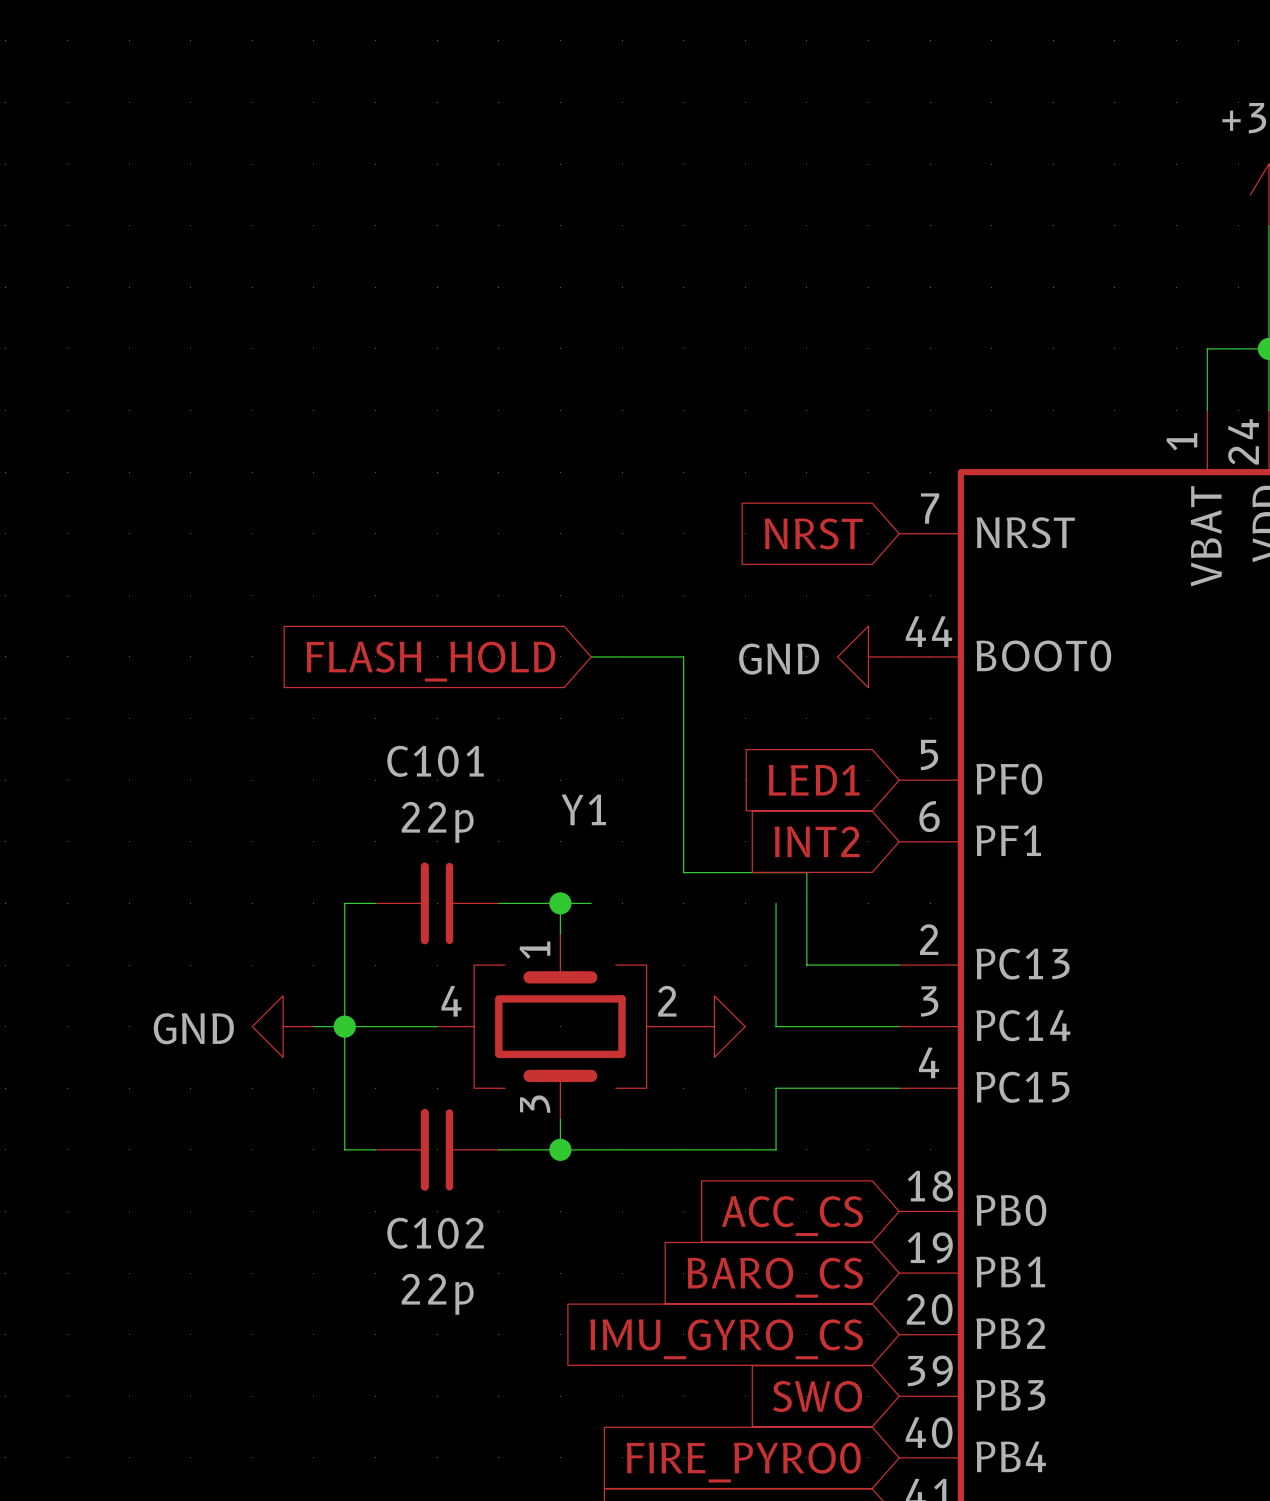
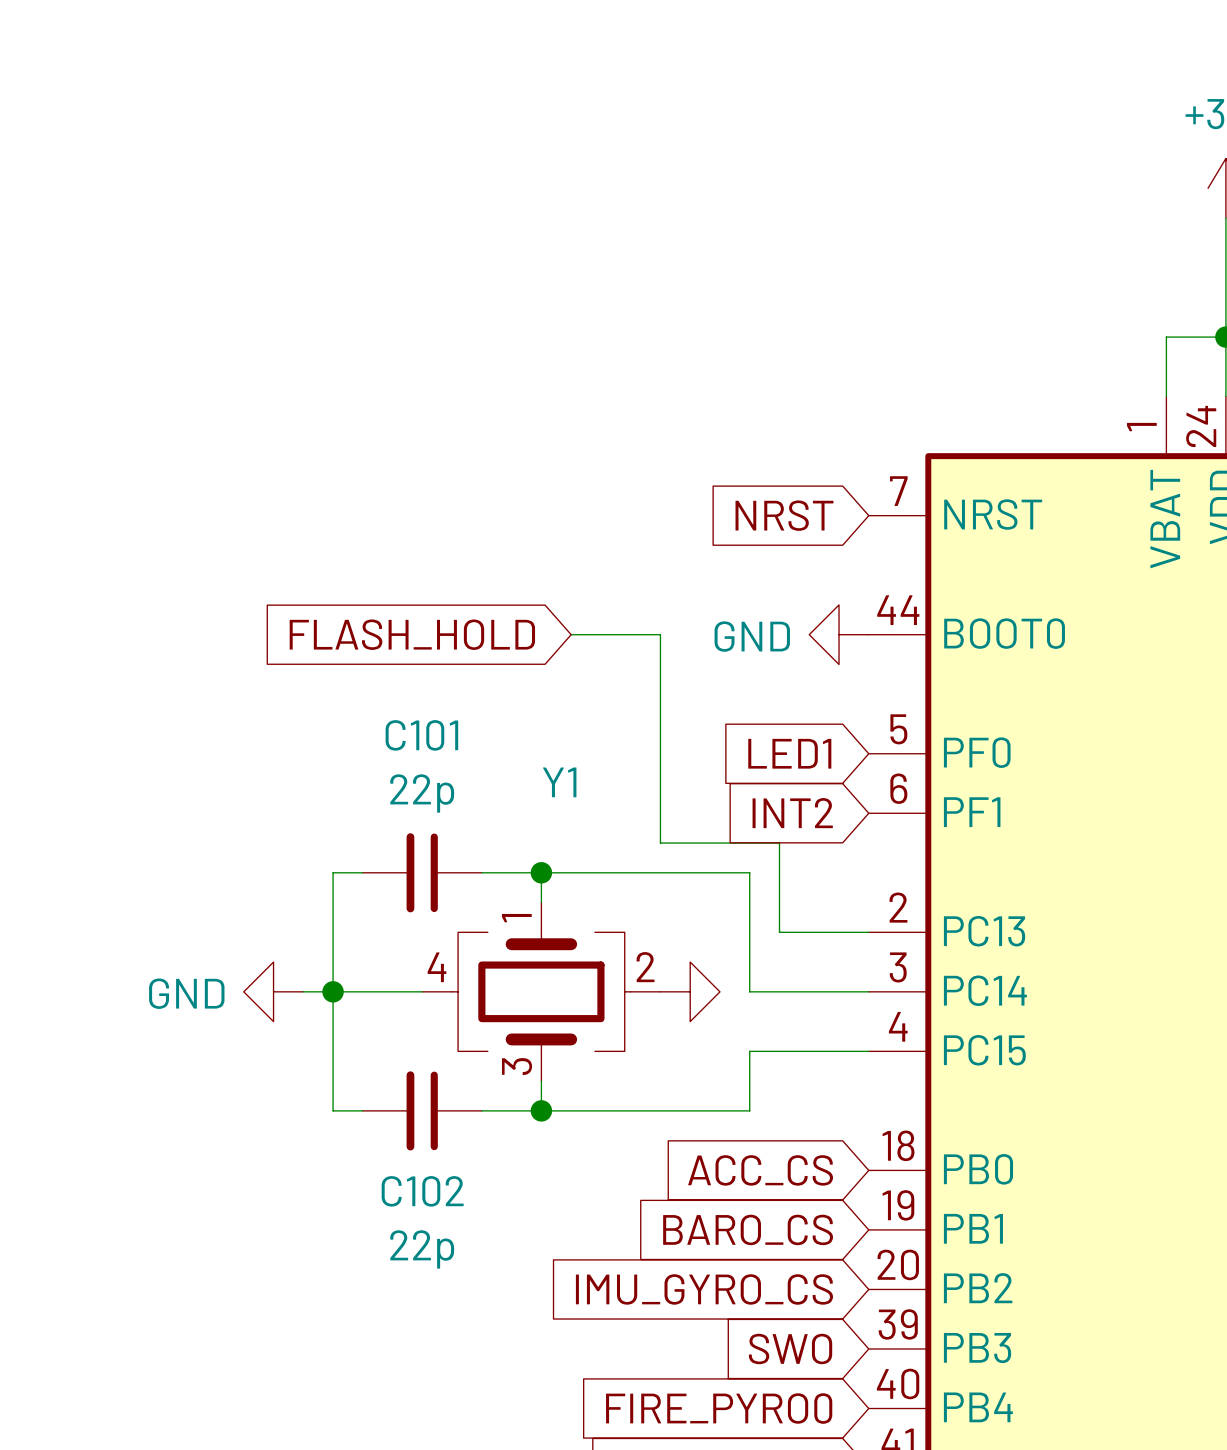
wire: none -> (571, 872) (749, 872)

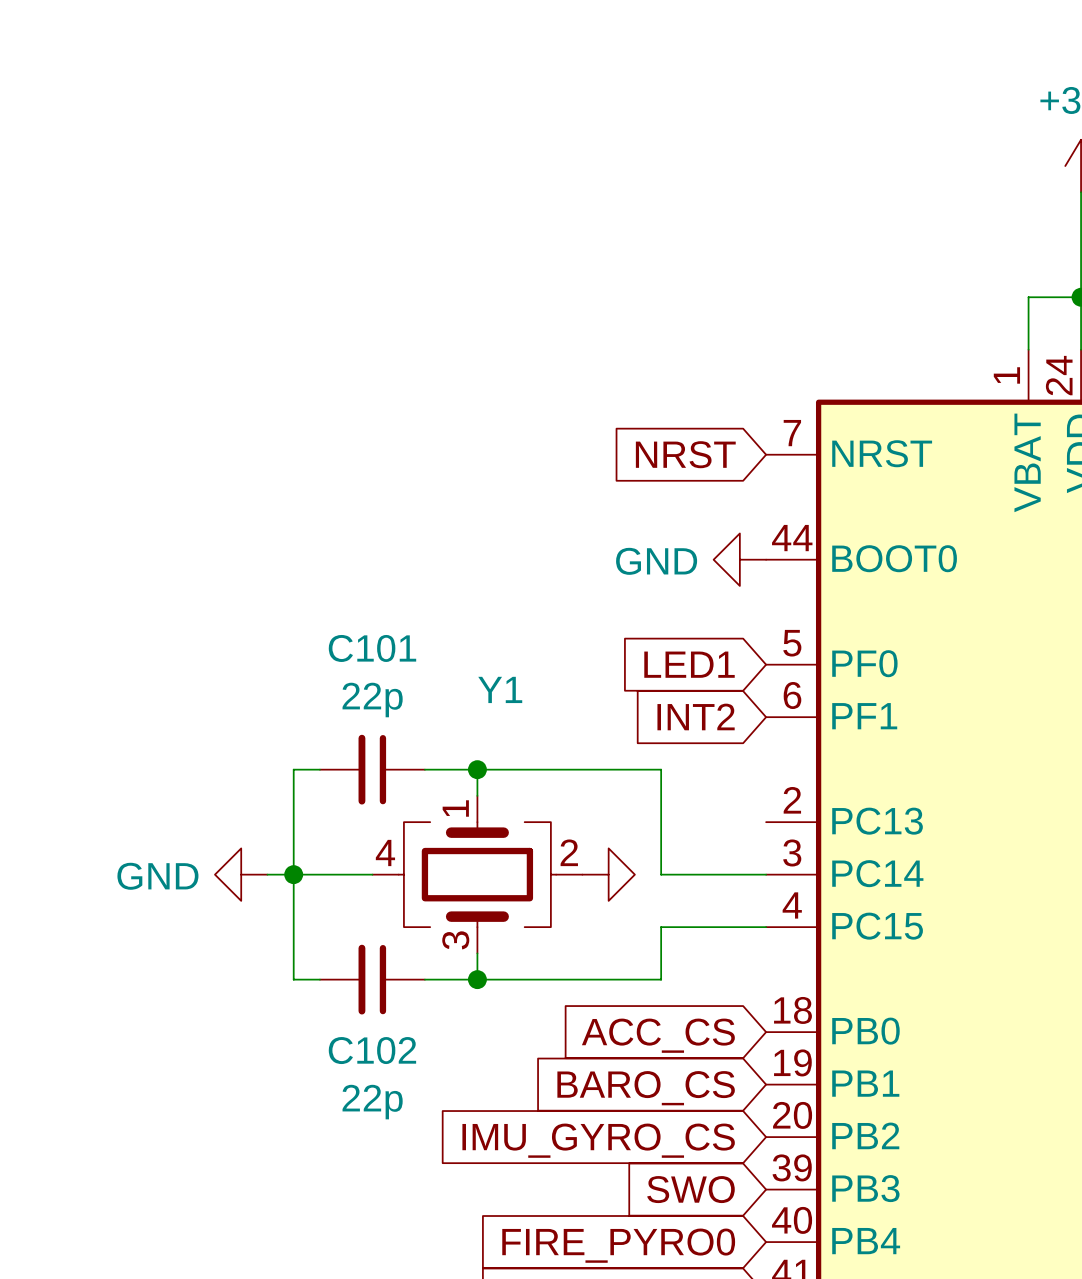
global label: FLASH_HOLD (412, 634) -> none
wire: (571, 634) (660, 634) (660, 843) (779, 843) (779, 932) (868, 932) -> none

